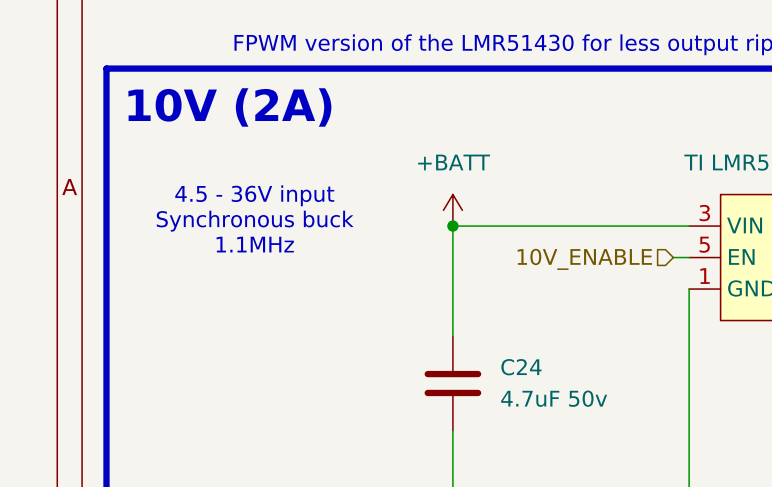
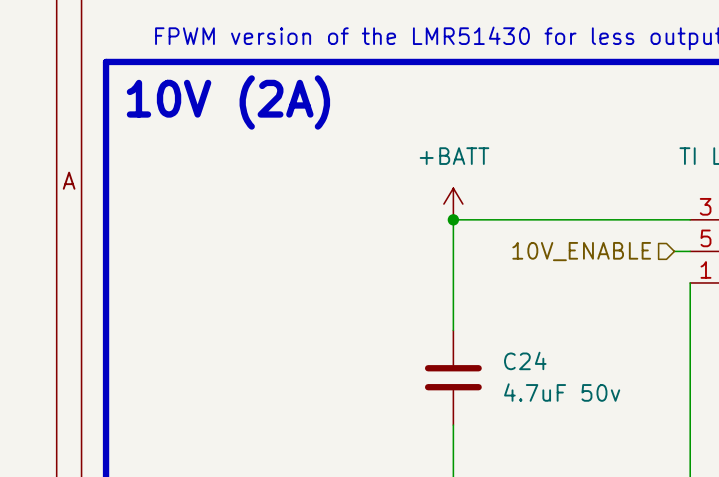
text: 4.5 - 36V input (254, 195) -> none
text: Synchronous buck (255, 221) -> none
text: 1.1MHz (255, 244) -> none

